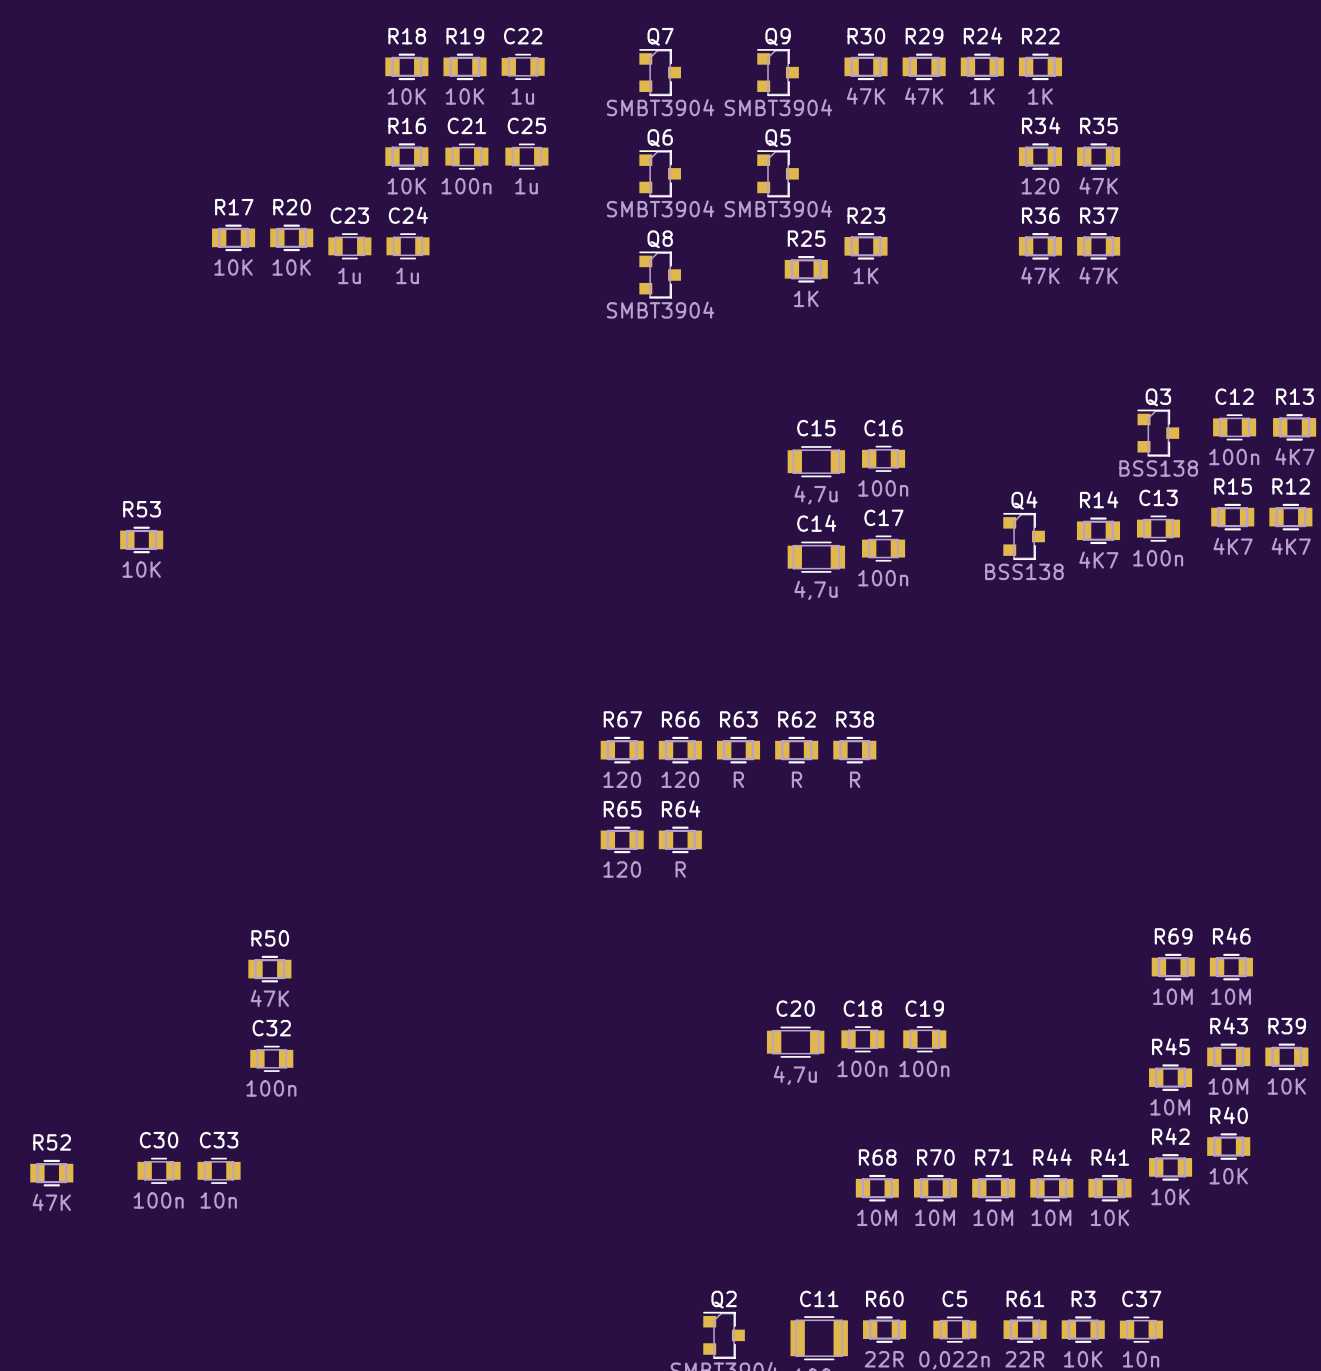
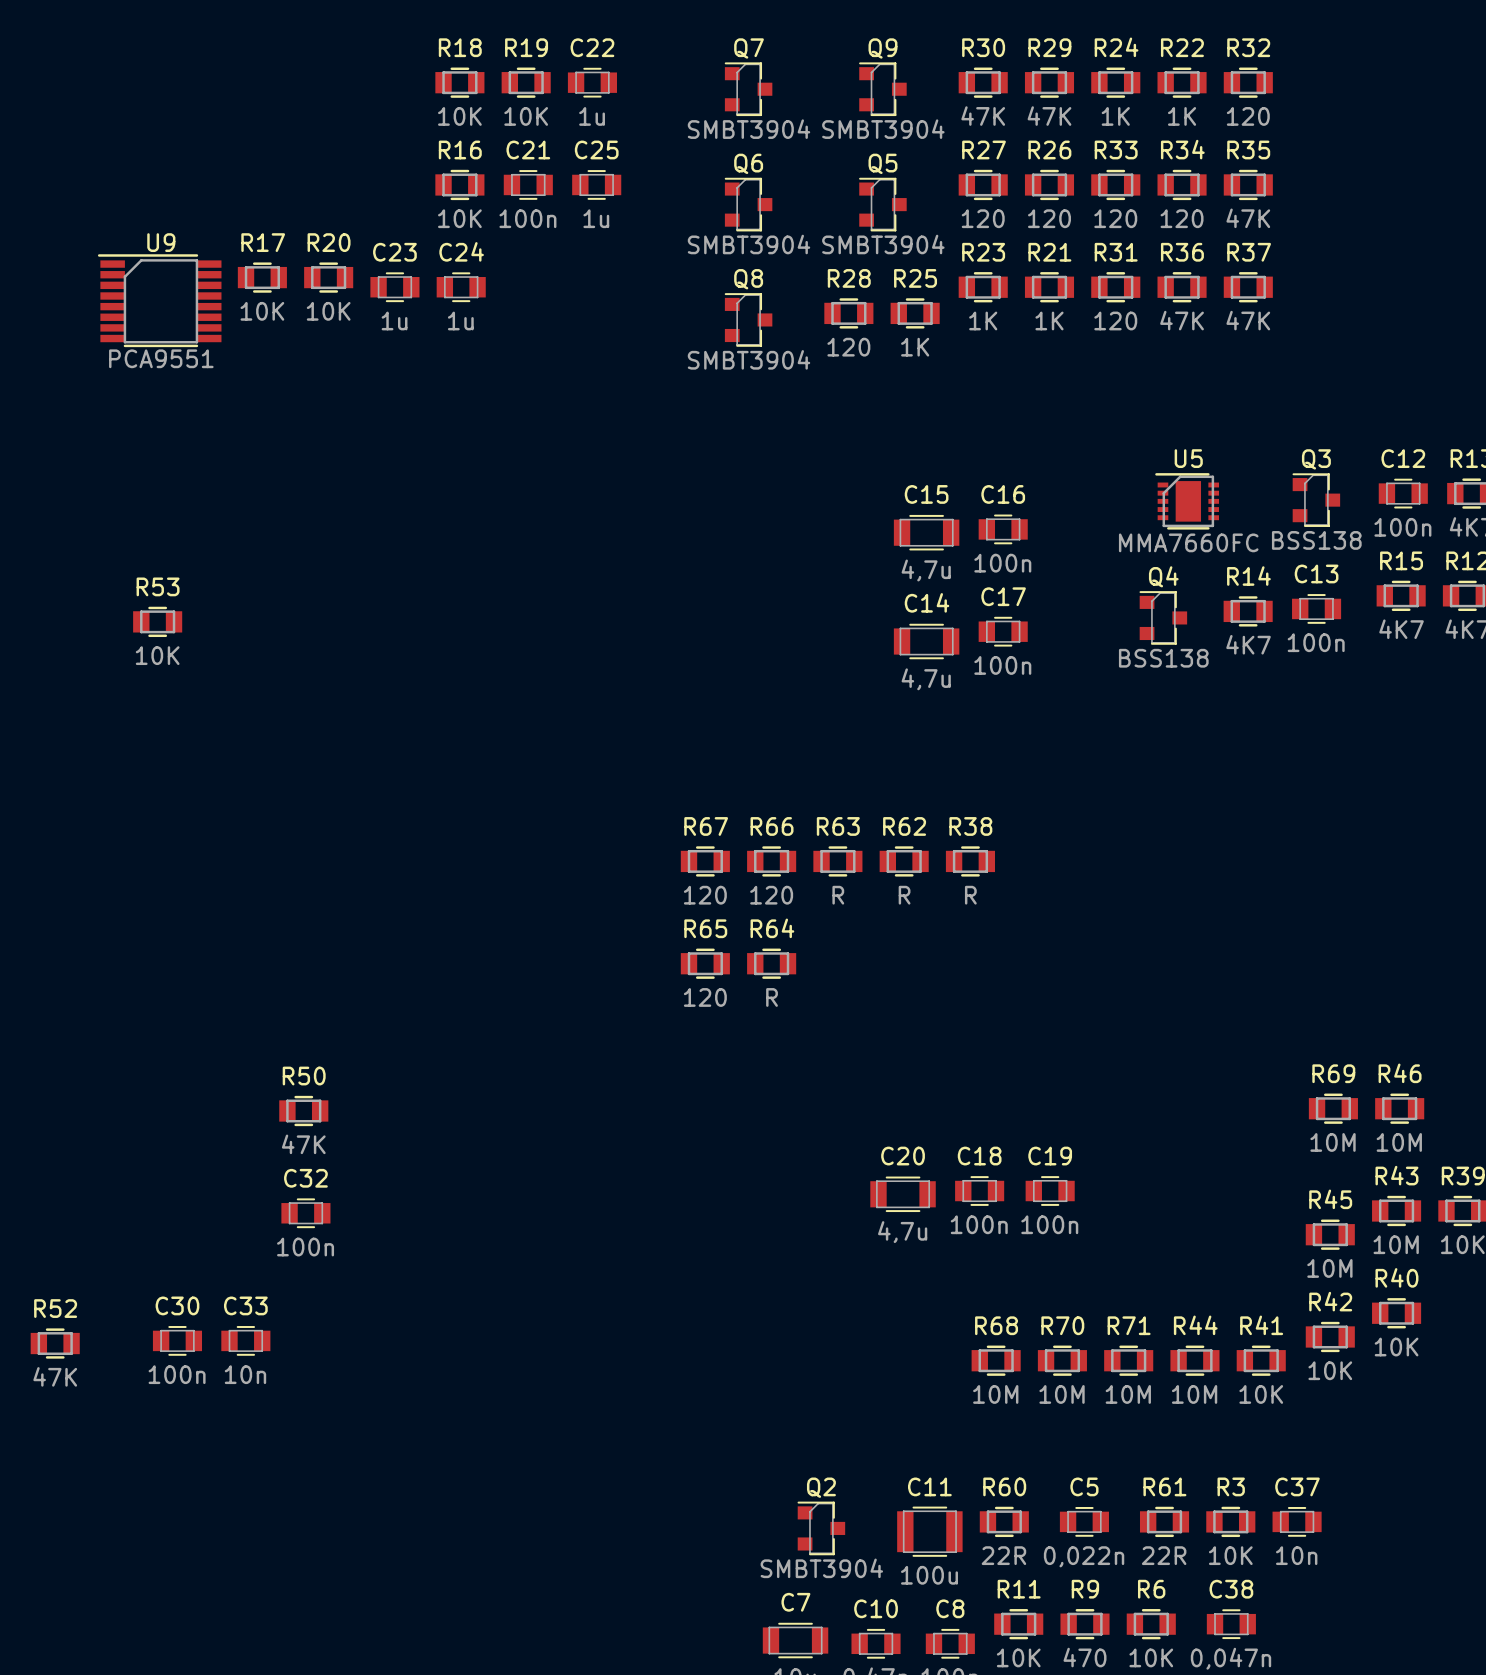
R32: none -> 120 (1248, 82)
R27: none -> 120 (983, 184)
R26: none -> 120 (1049, 184)
R33: none -> 120 (1115, 184)
R21: none -> 1K (1049, 287)
R31: none -> 120 (1115, 287)
U9: none -> PCA9551 (159, 300)
R28: none -> 120 (848, 313)
U5: none -> MMA7660FC (1187, 501)

